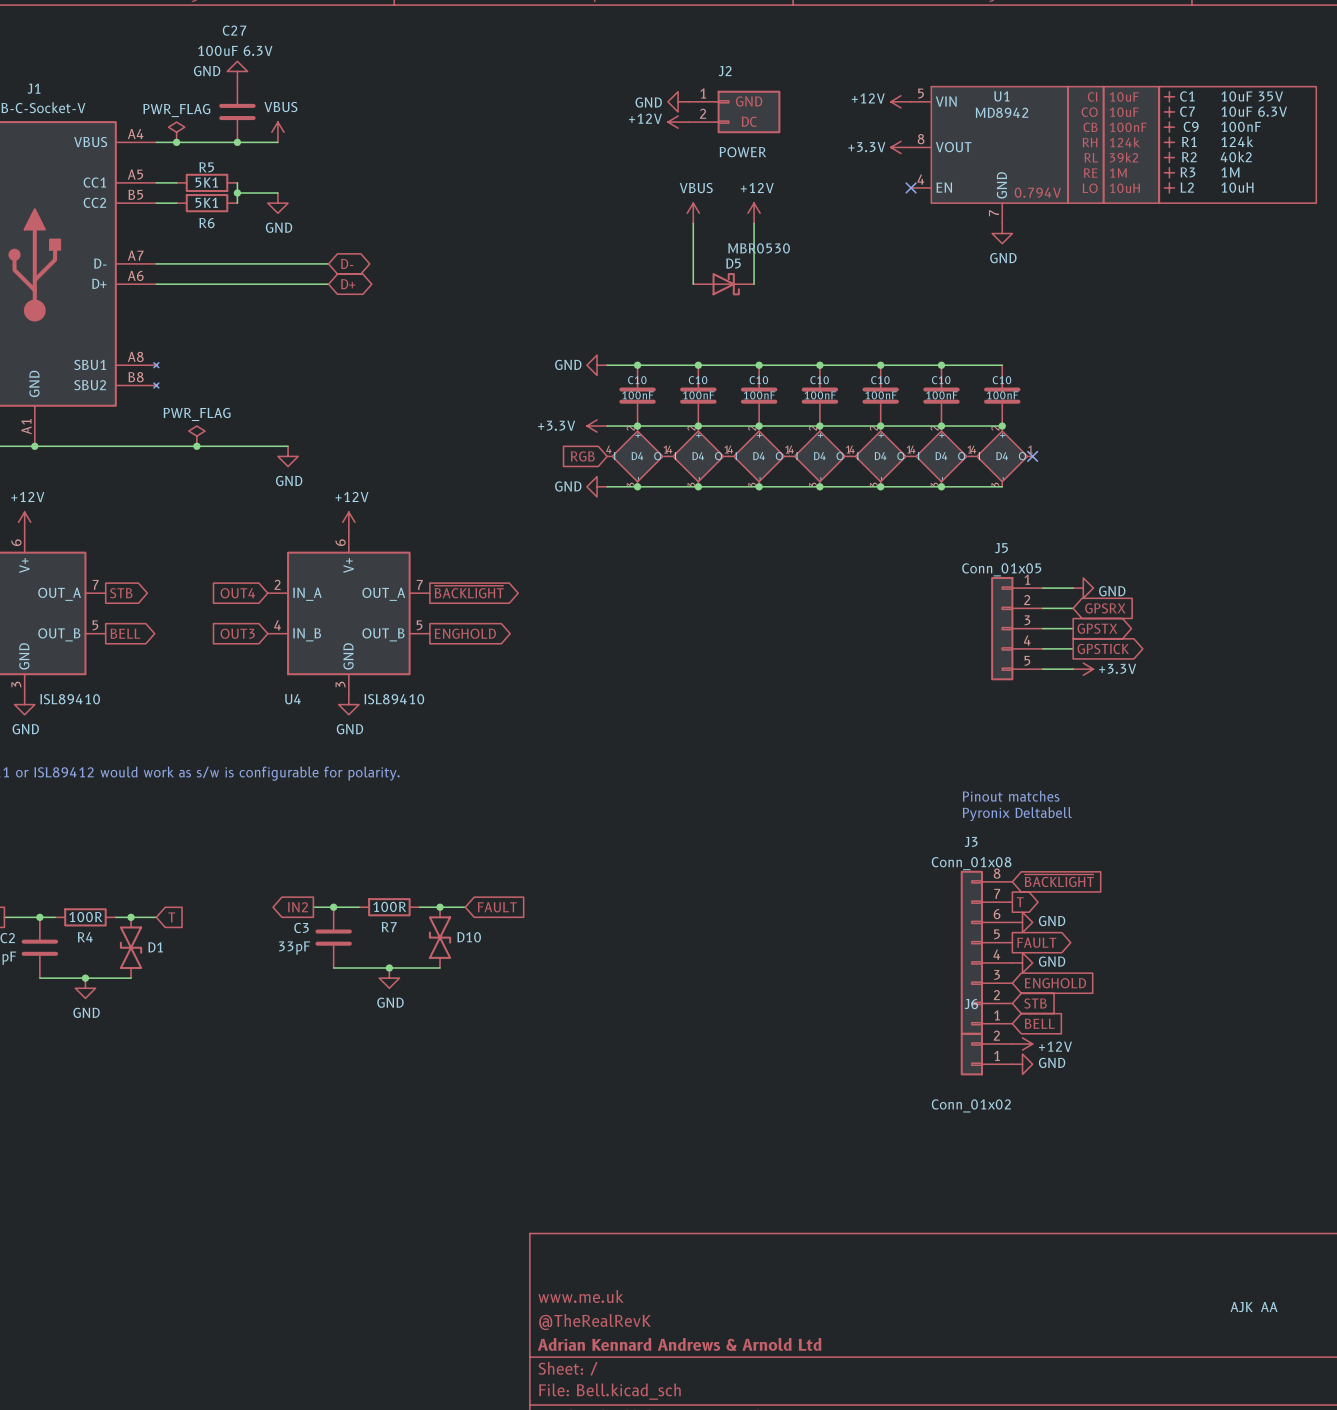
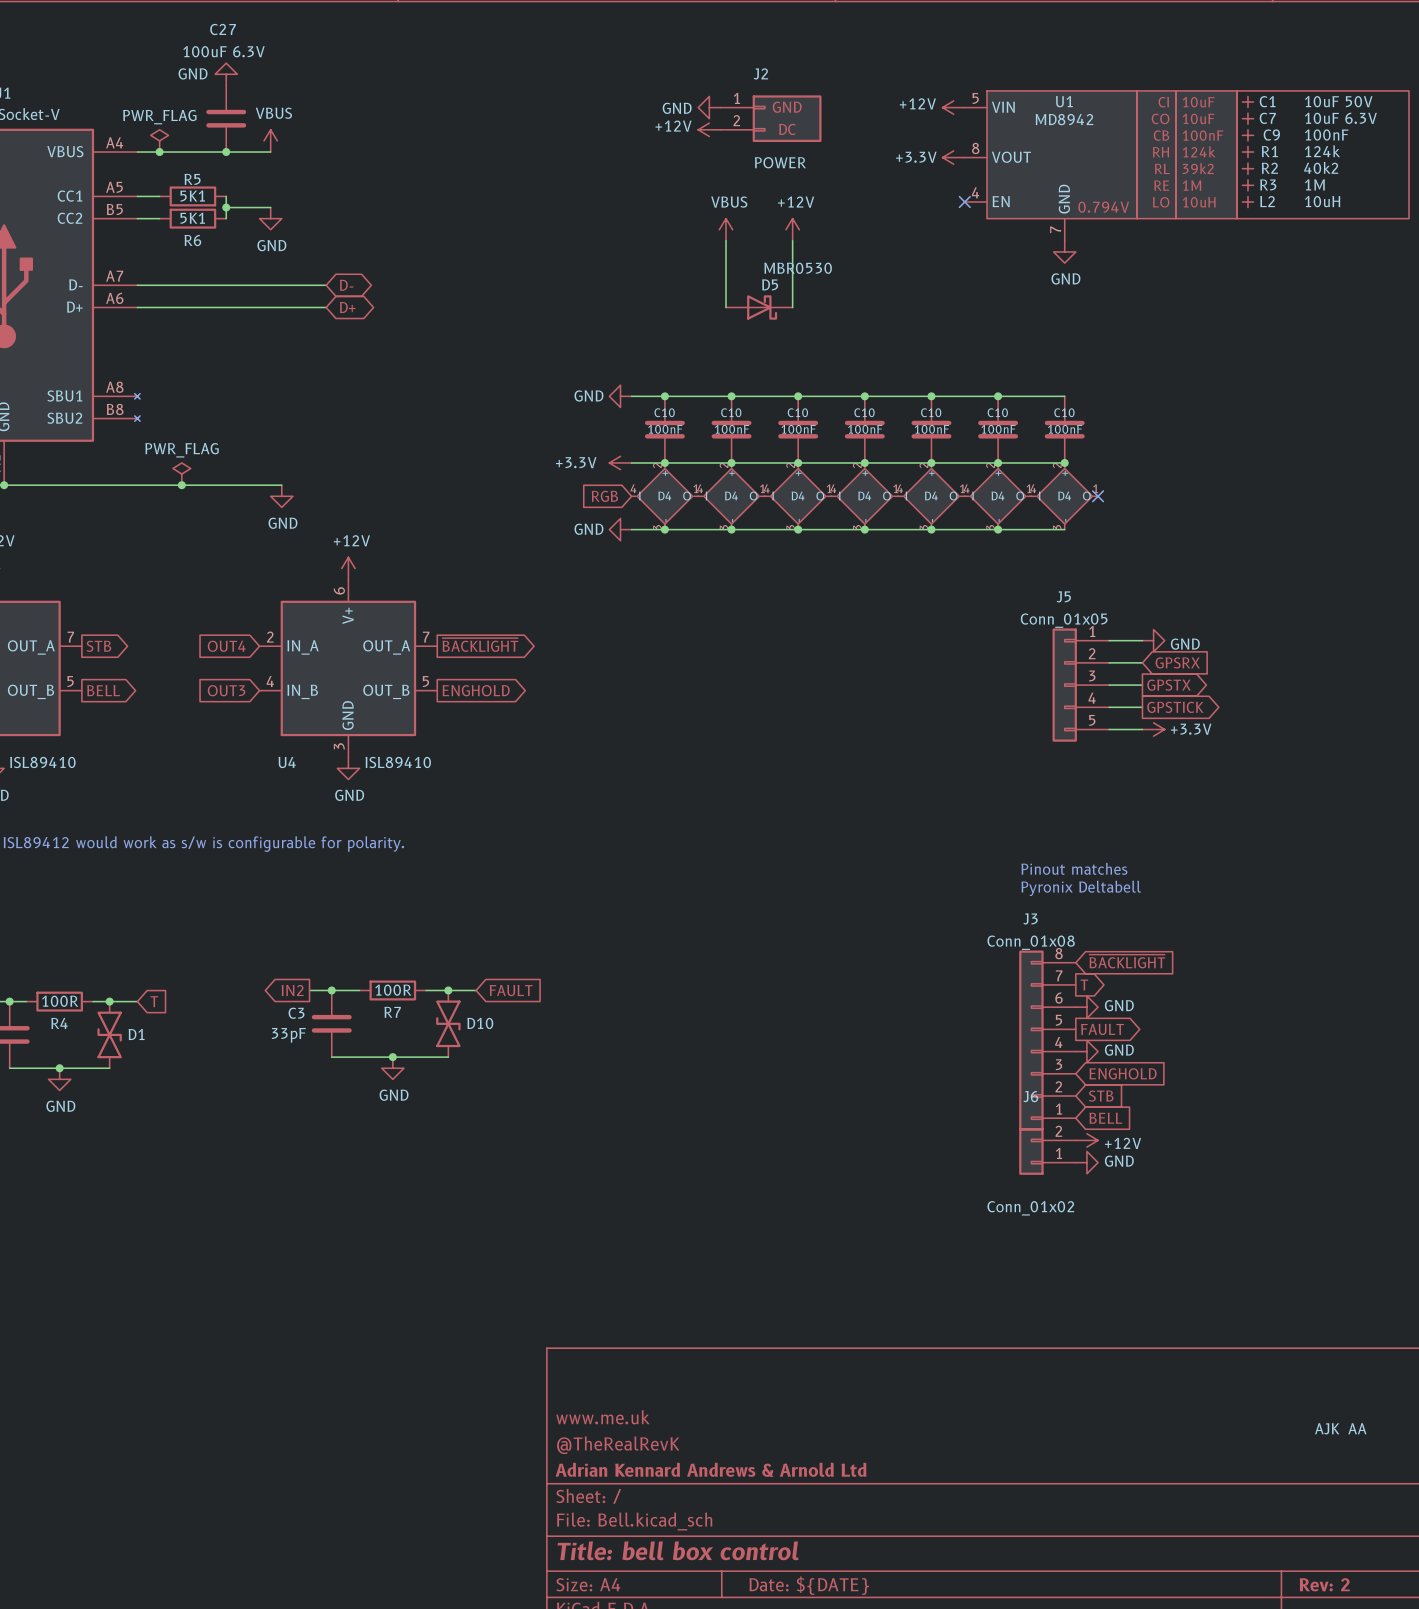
C1 value: 10uF 35V (1252, 96) -> 10uF 50V (1338, 101)

